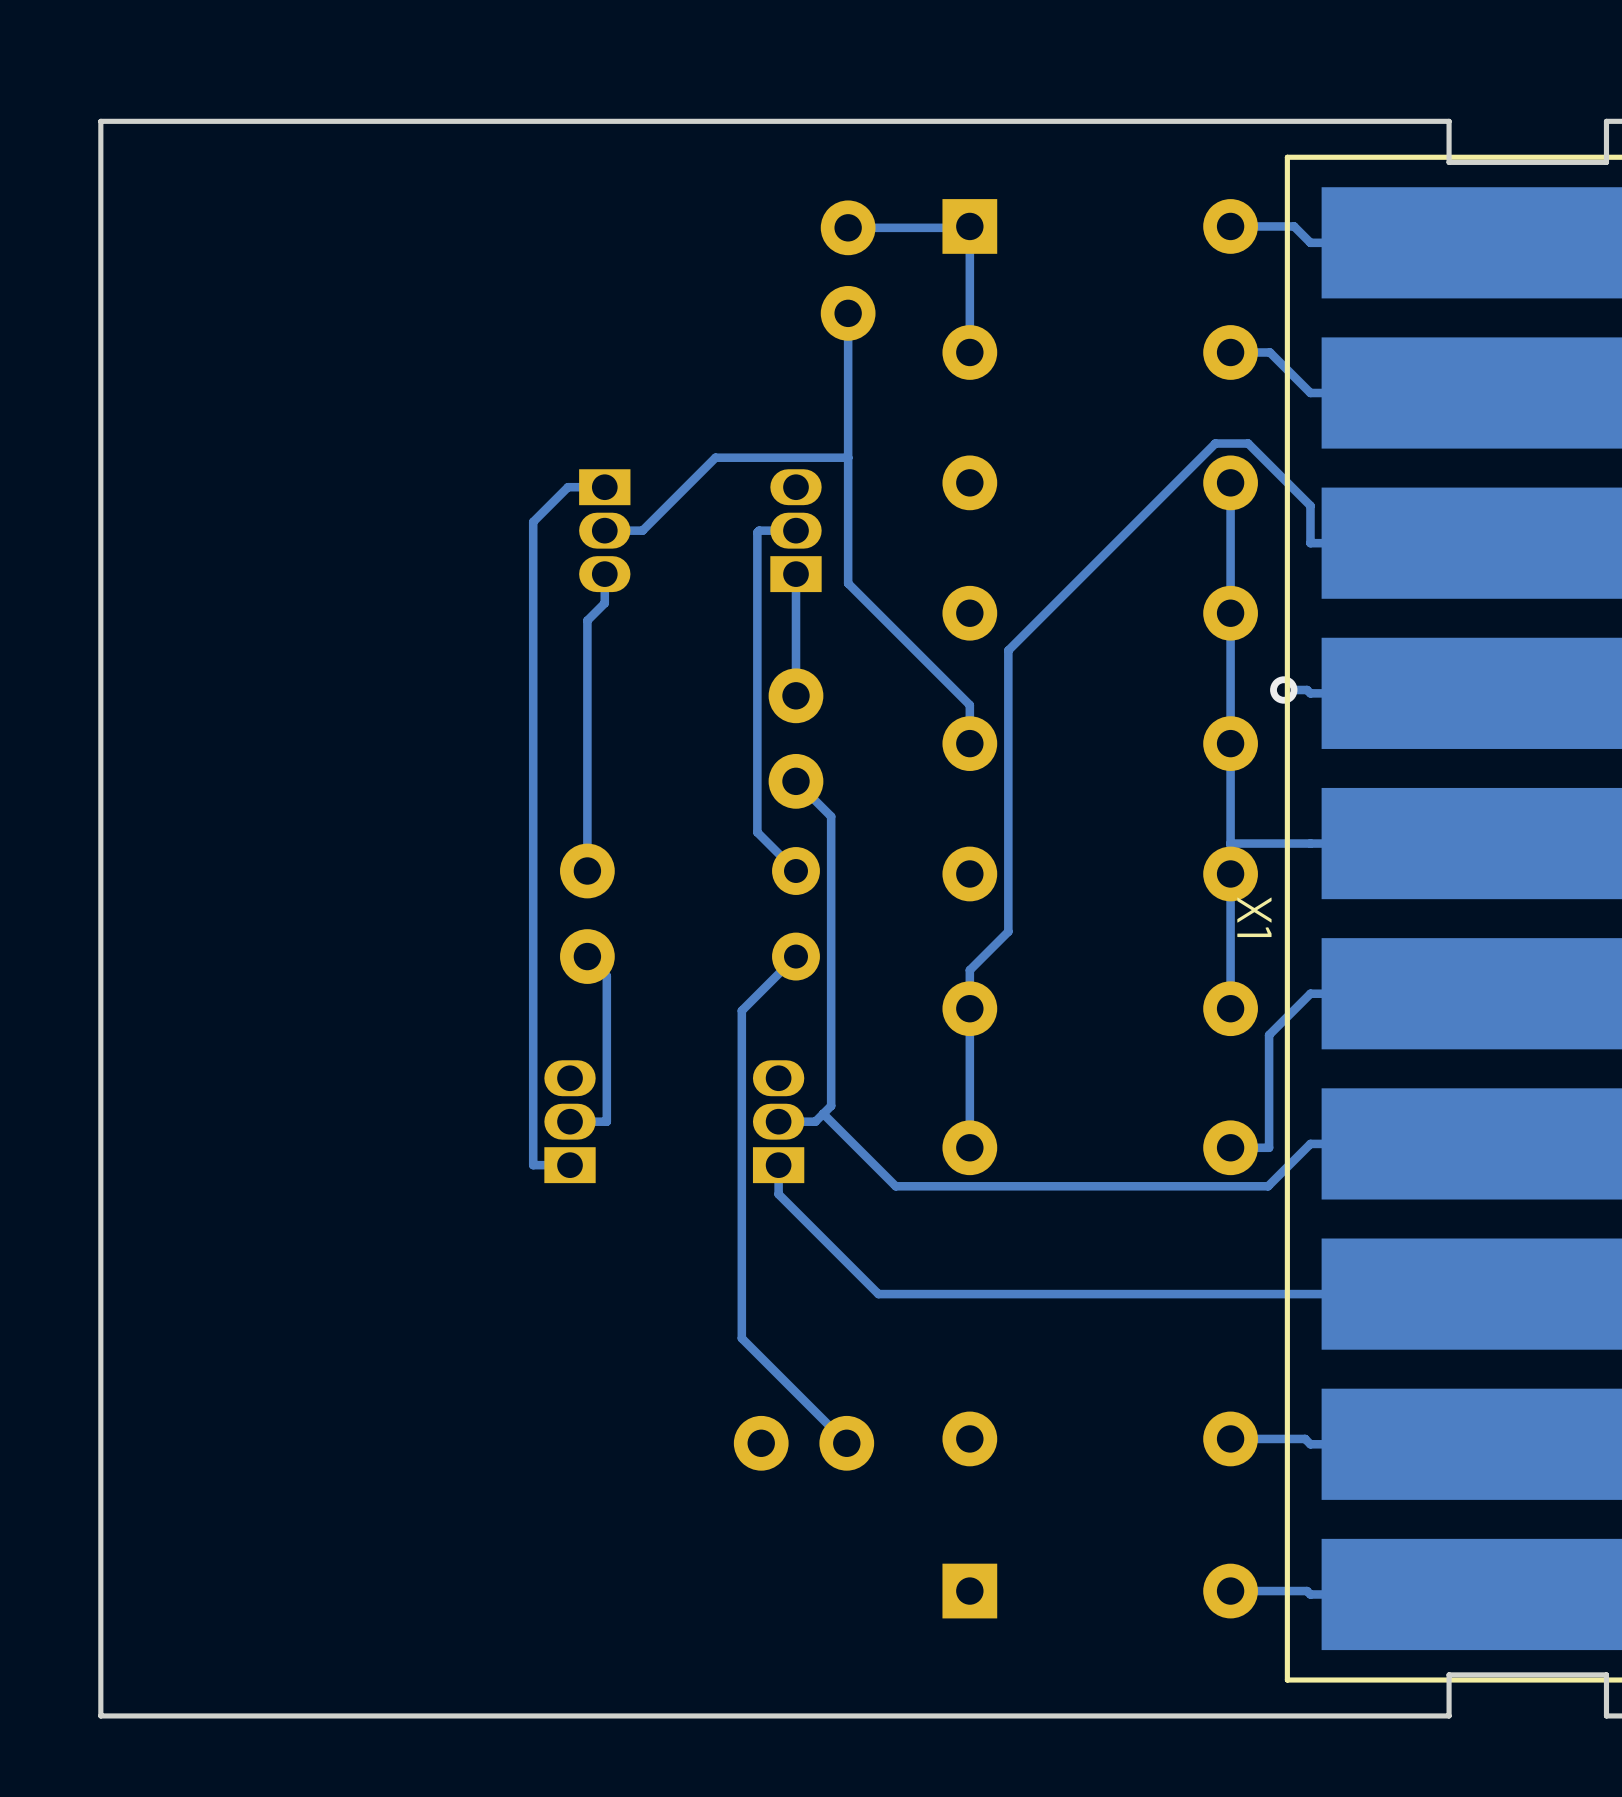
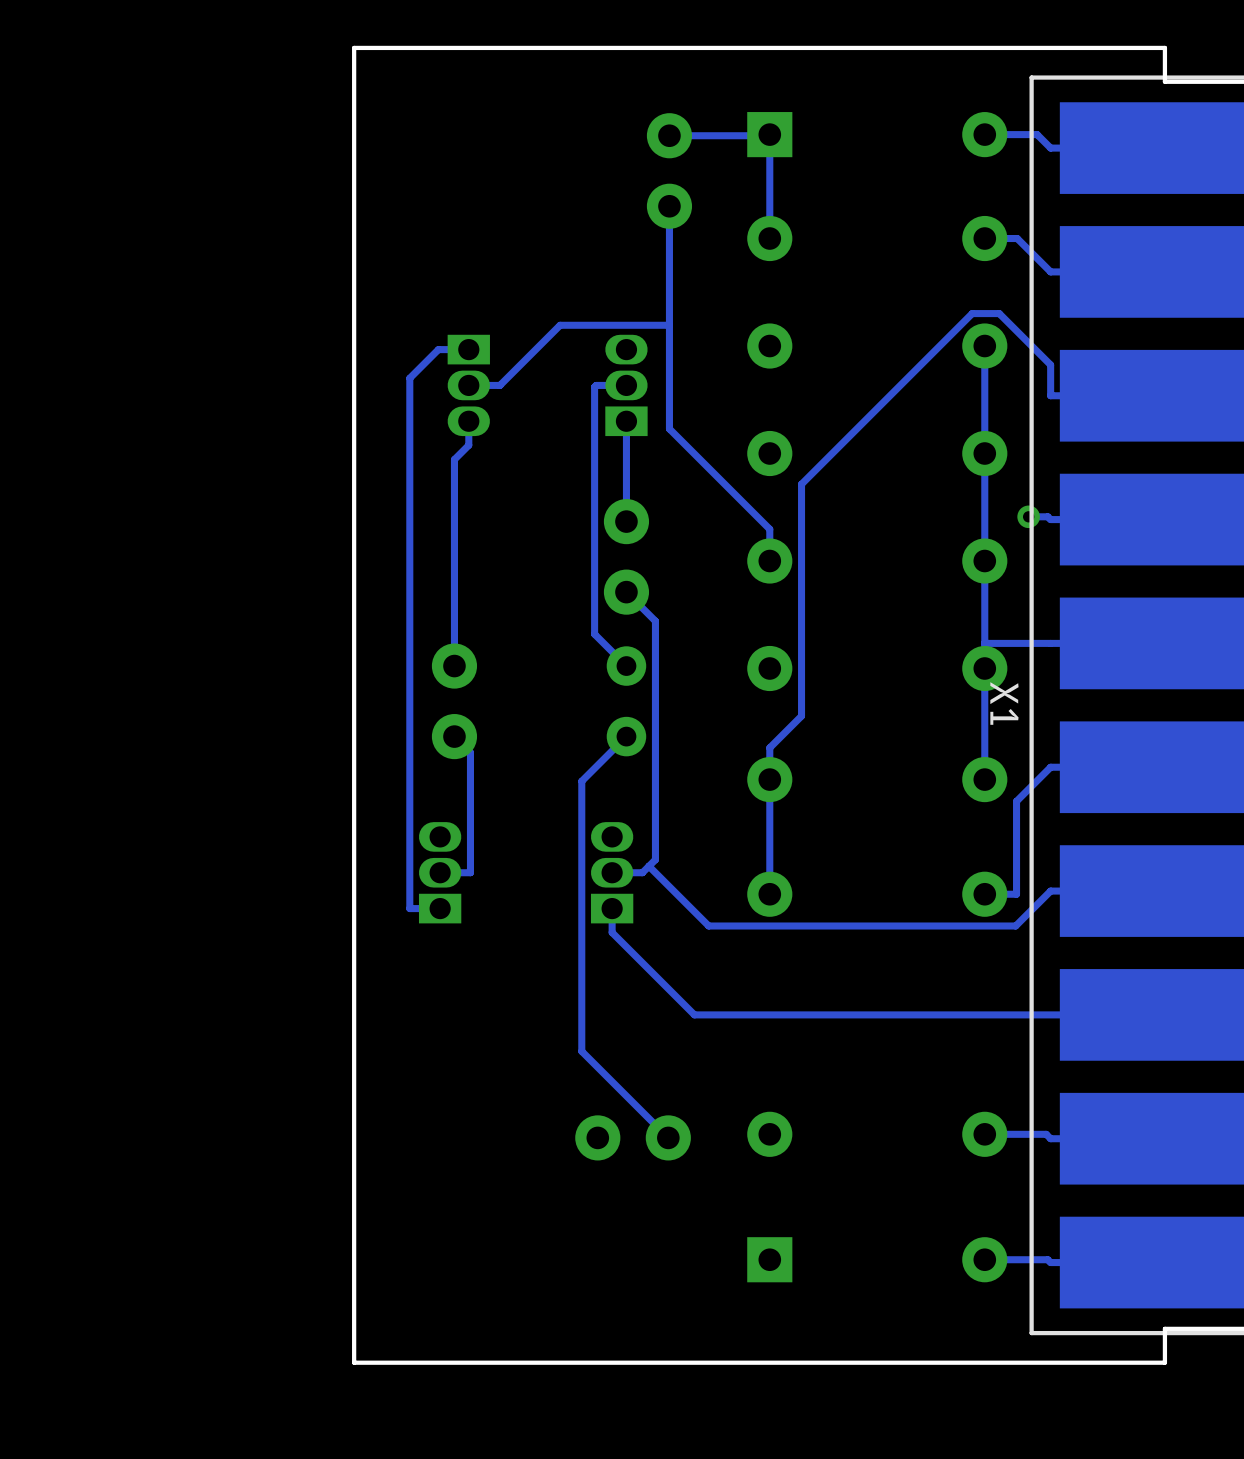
board edge: (465, 121) (100, 121) (100, 1715) (465, 1715) -> (354, 47) (354, 1362)

